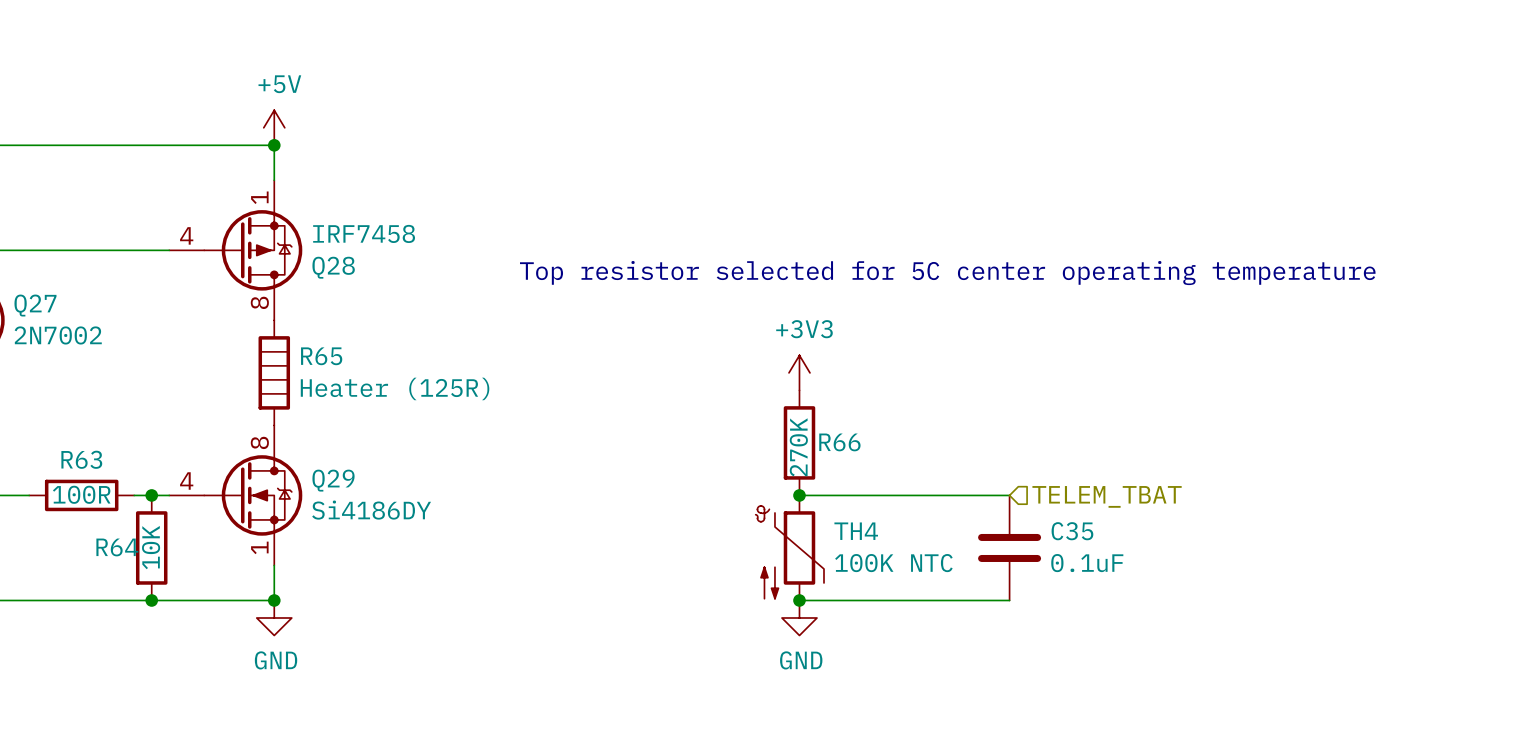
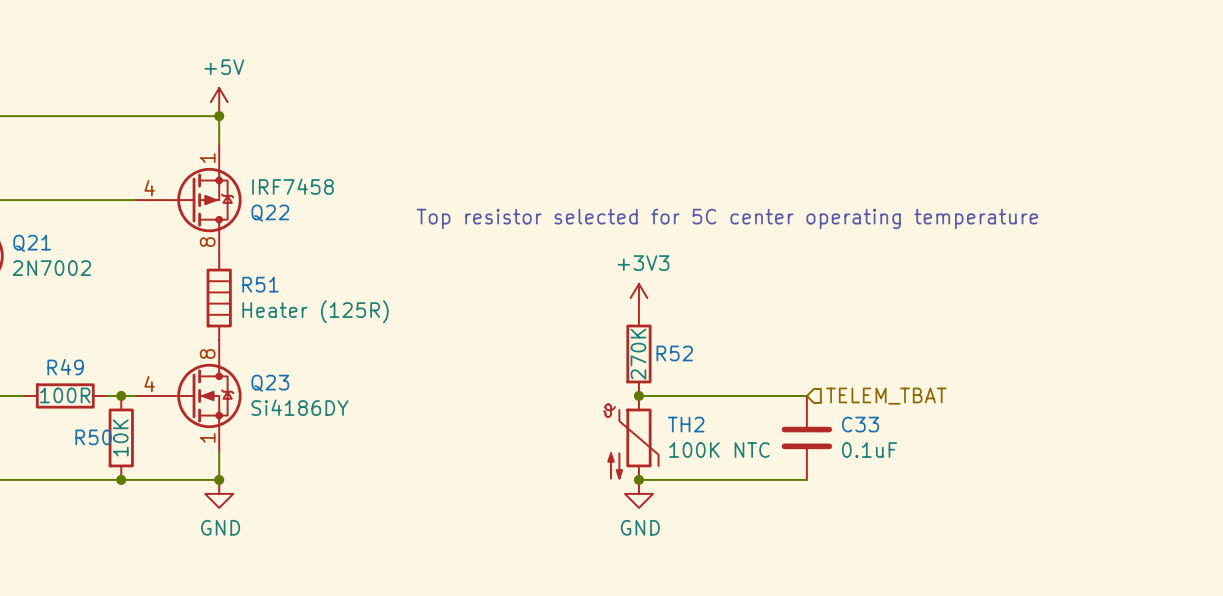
Q28 name: Q28 (333, 267) -> Q22 (270, 213)
Q27 name: Q27 (35, 305) -> Q21 (32, 243)
R65 name: R65 (321, 356) -> R51 (260, 284)
R66 name: R66 (839, 442) -> R52 (674, 353)
R63 name: R63 (81, 459) -> R49 (65, 367)
Q29 name: Q29 (333, 480) -> Q23 (270, 383)
TH4 name: TH4 (856, 531) -> TH2 (686, 424)
C35 name: C35 (1072, 531) -> C33 (860, 424)
R64 name: R64 (117, 547) -> R50 (93, 437)

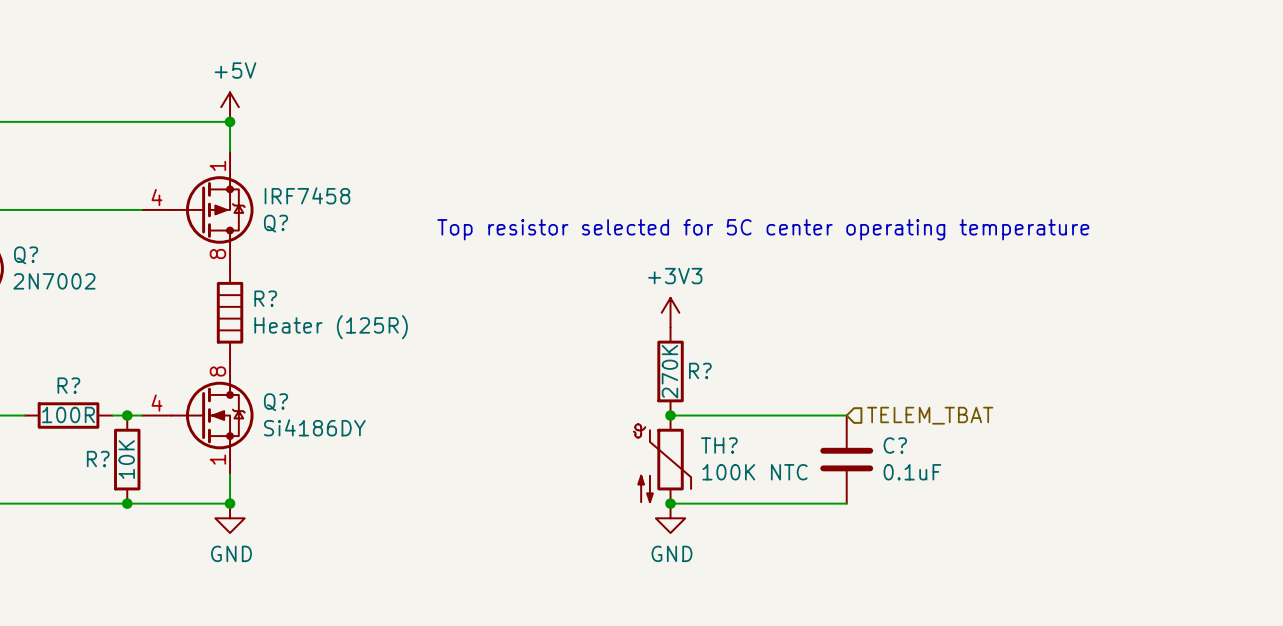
Q22 name: Q22 (270, 213) -> Q? (276, 223)
Q21 name: Q21 (32, 243) -> Q? (26, 255)
R51 name: R51 (260, 284) -> R? (265, 298)
R52 name: R52 (674, 353) -> R? (700, 370)
R49 name: R49 (65, 367) -> R? (68, 385)
Q23 name: Q23 (270, 383) -> Q? (276, 402)
TH2 name: TH2 (686, 424) -> TH? (719, 445)
C33 name: C33 (860, 424) -> C? (895, 445)
R50 name: R50 (93, 437) -> R? (98, 459)

